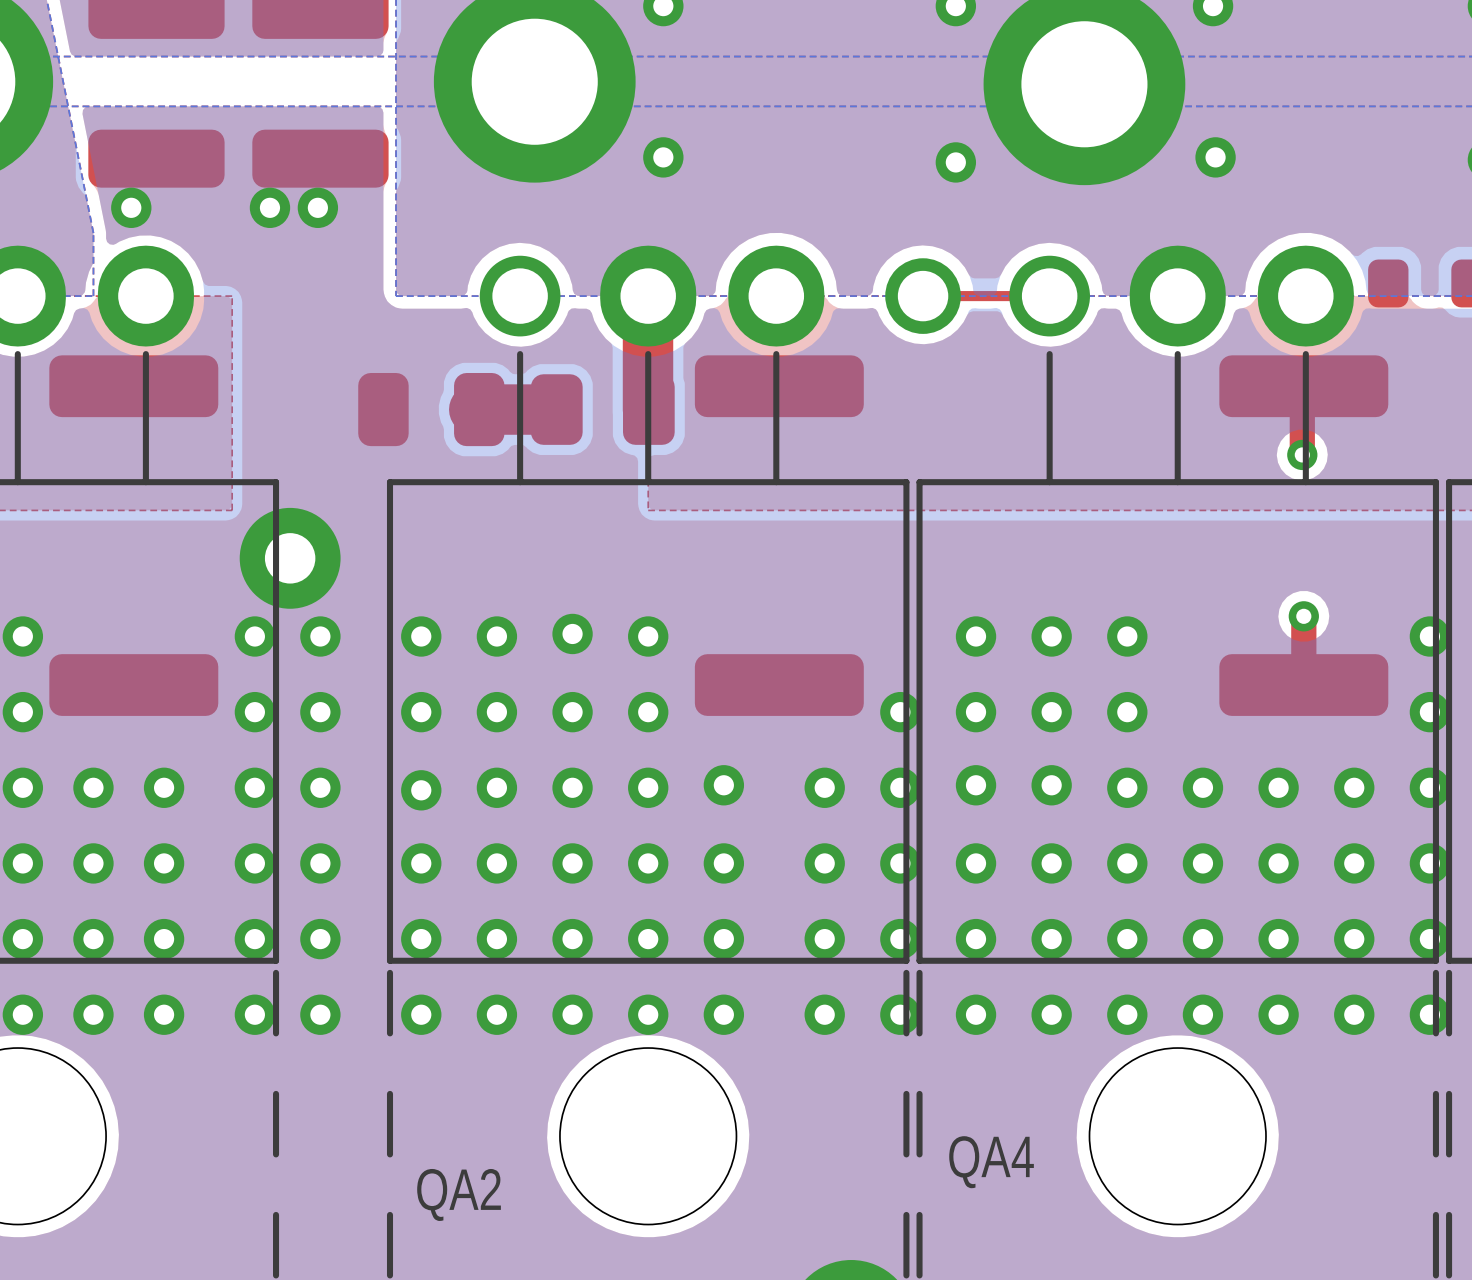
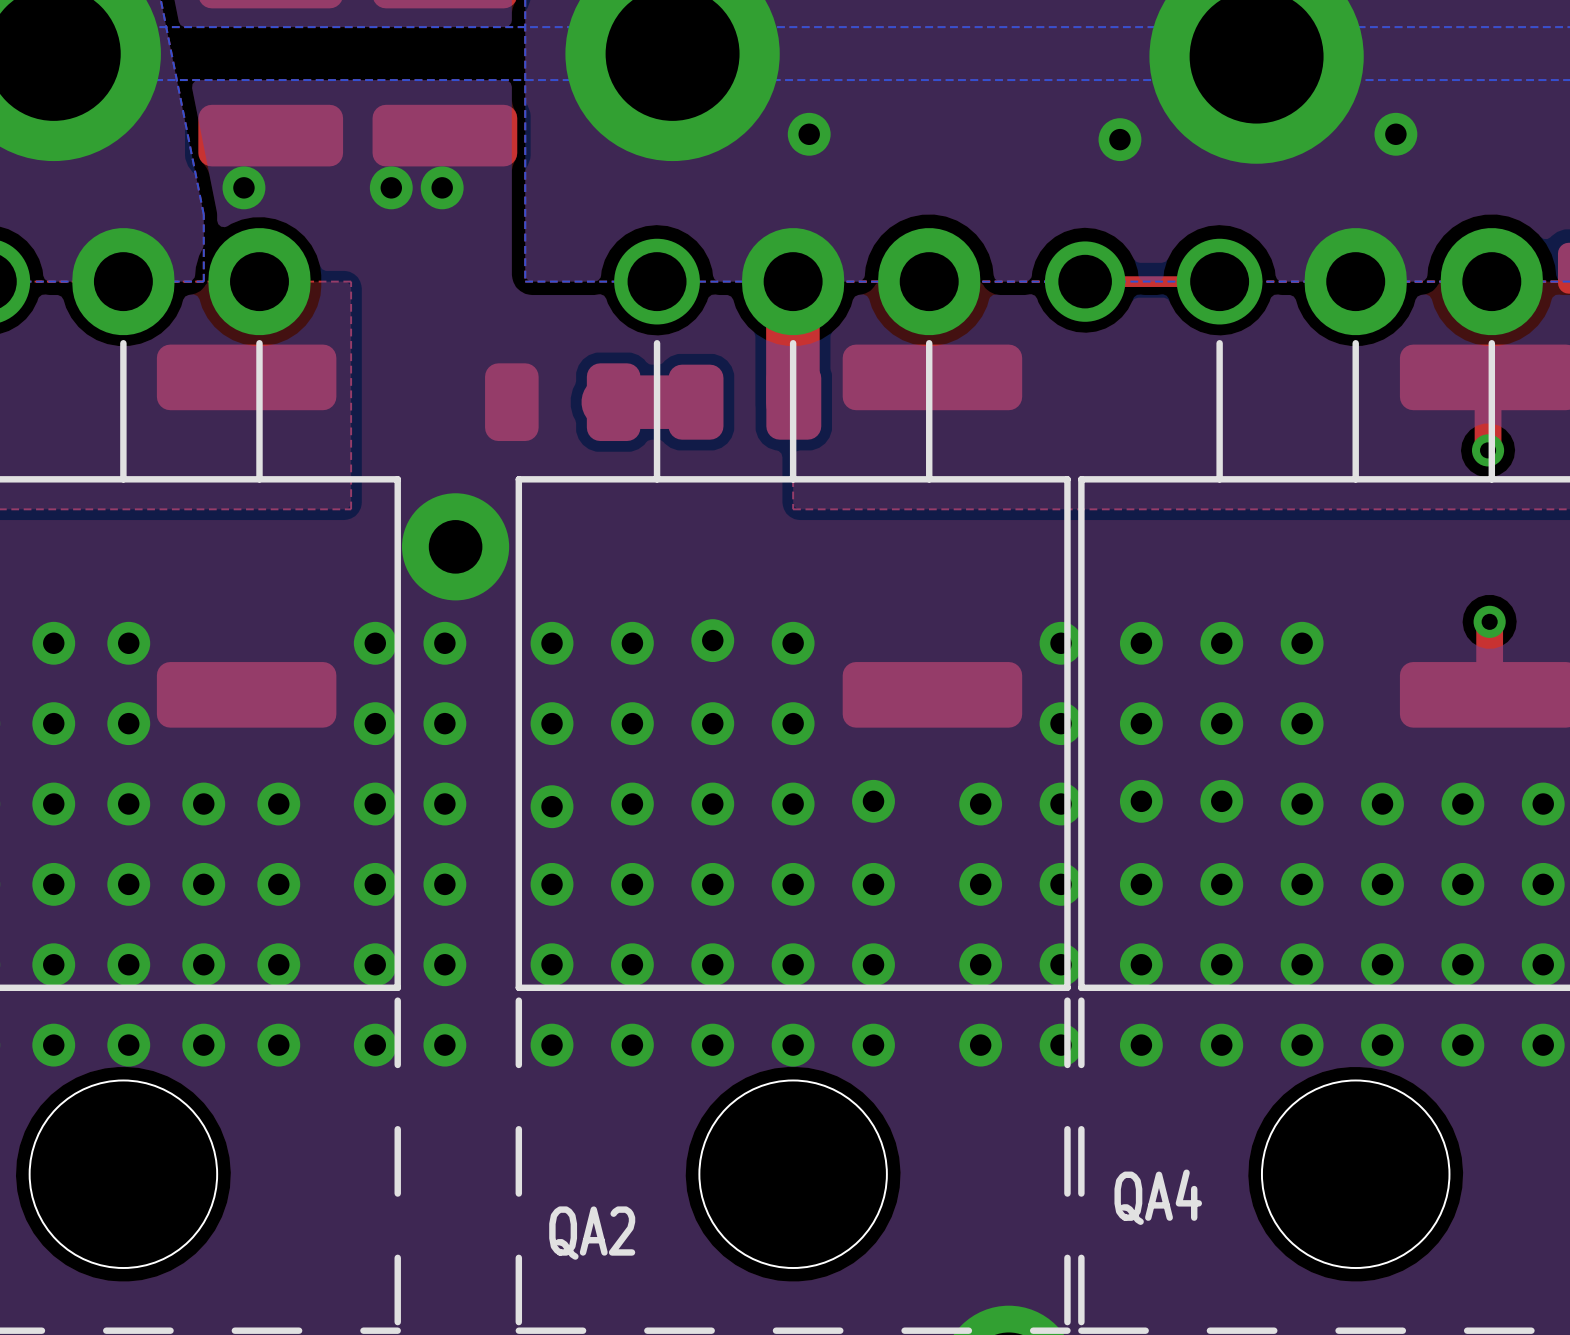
part position: (290, 558) -> (455, 546)
via: none -> (1061, 643)

